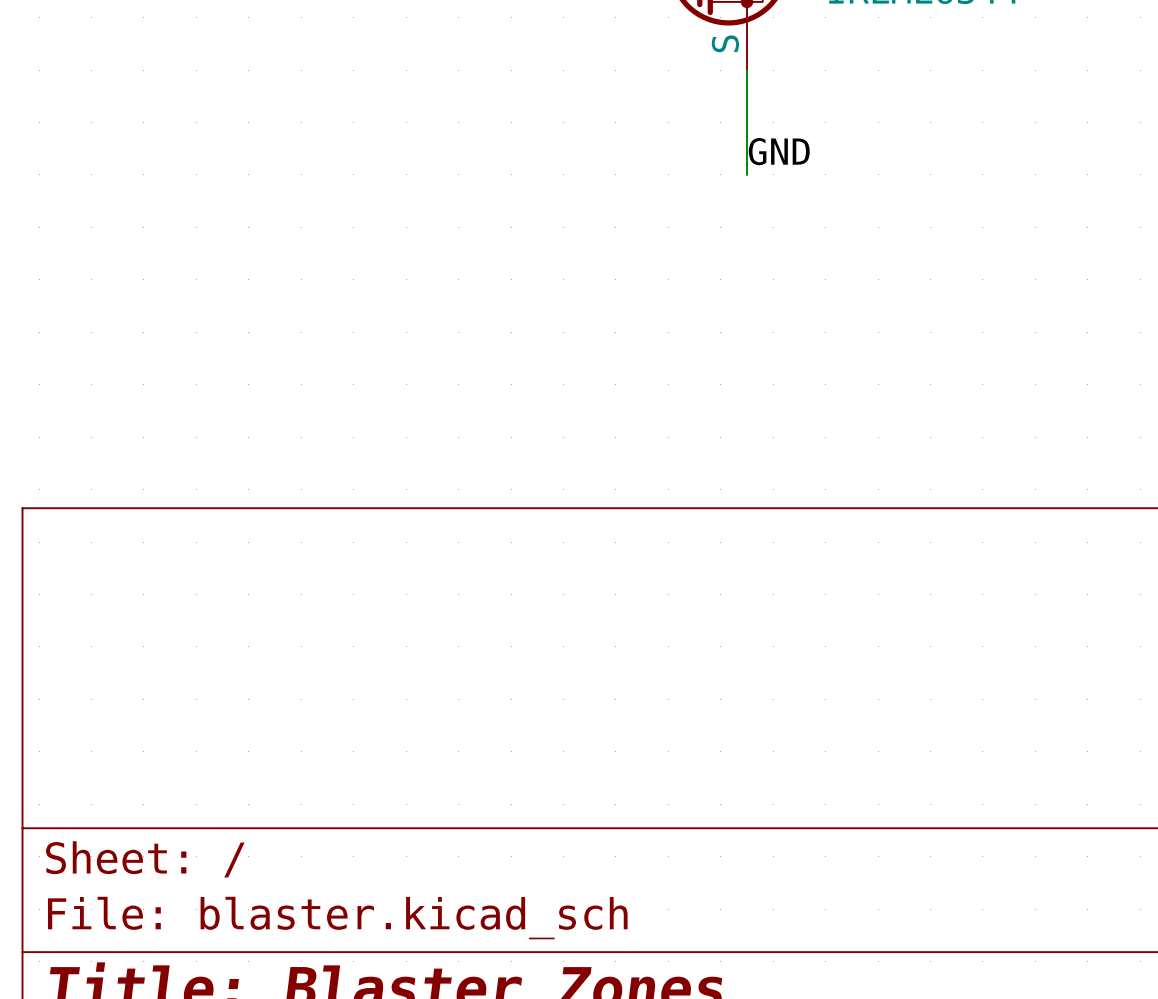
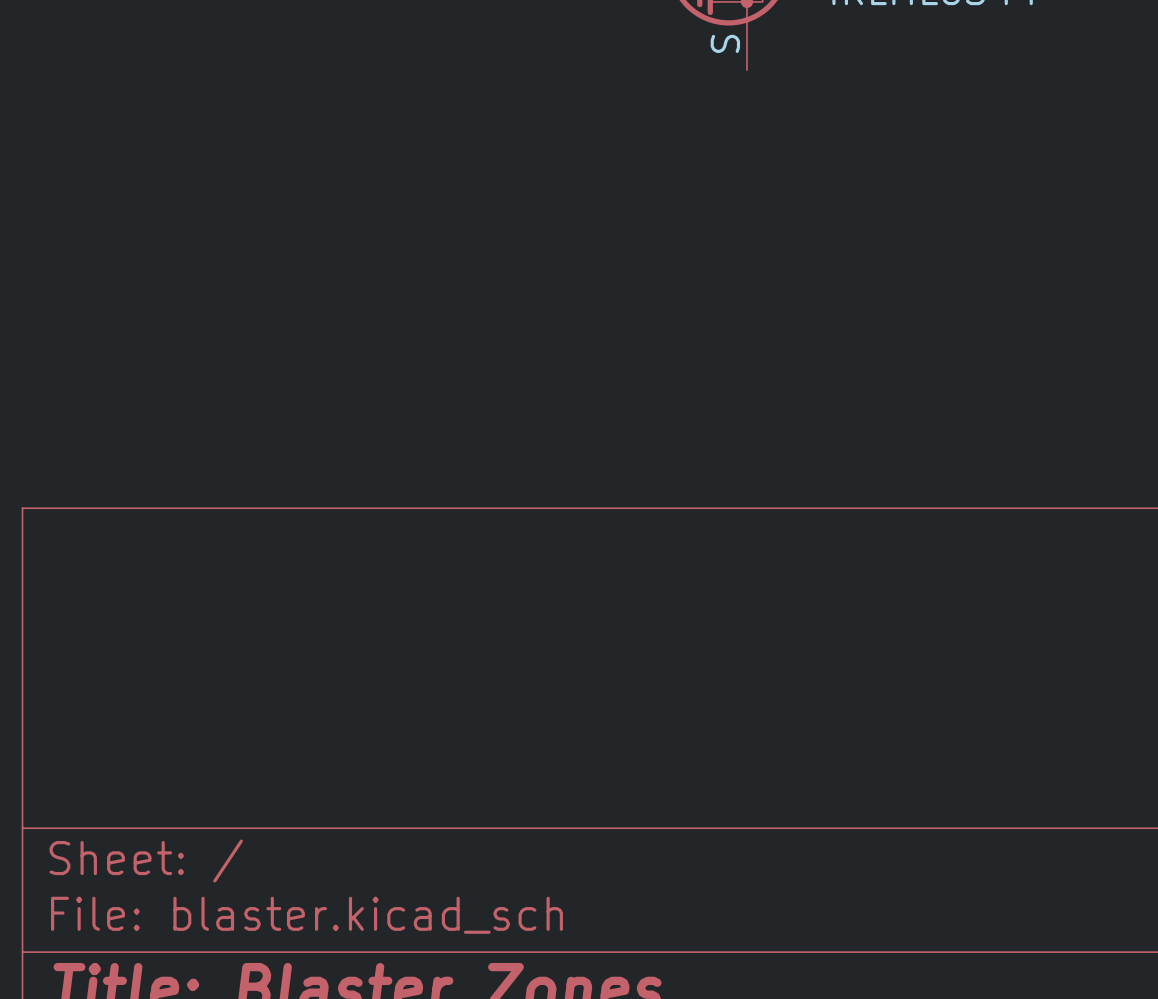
wire: (746, 70) (746, 174) -> none
label: GND (779, 151) -> none

